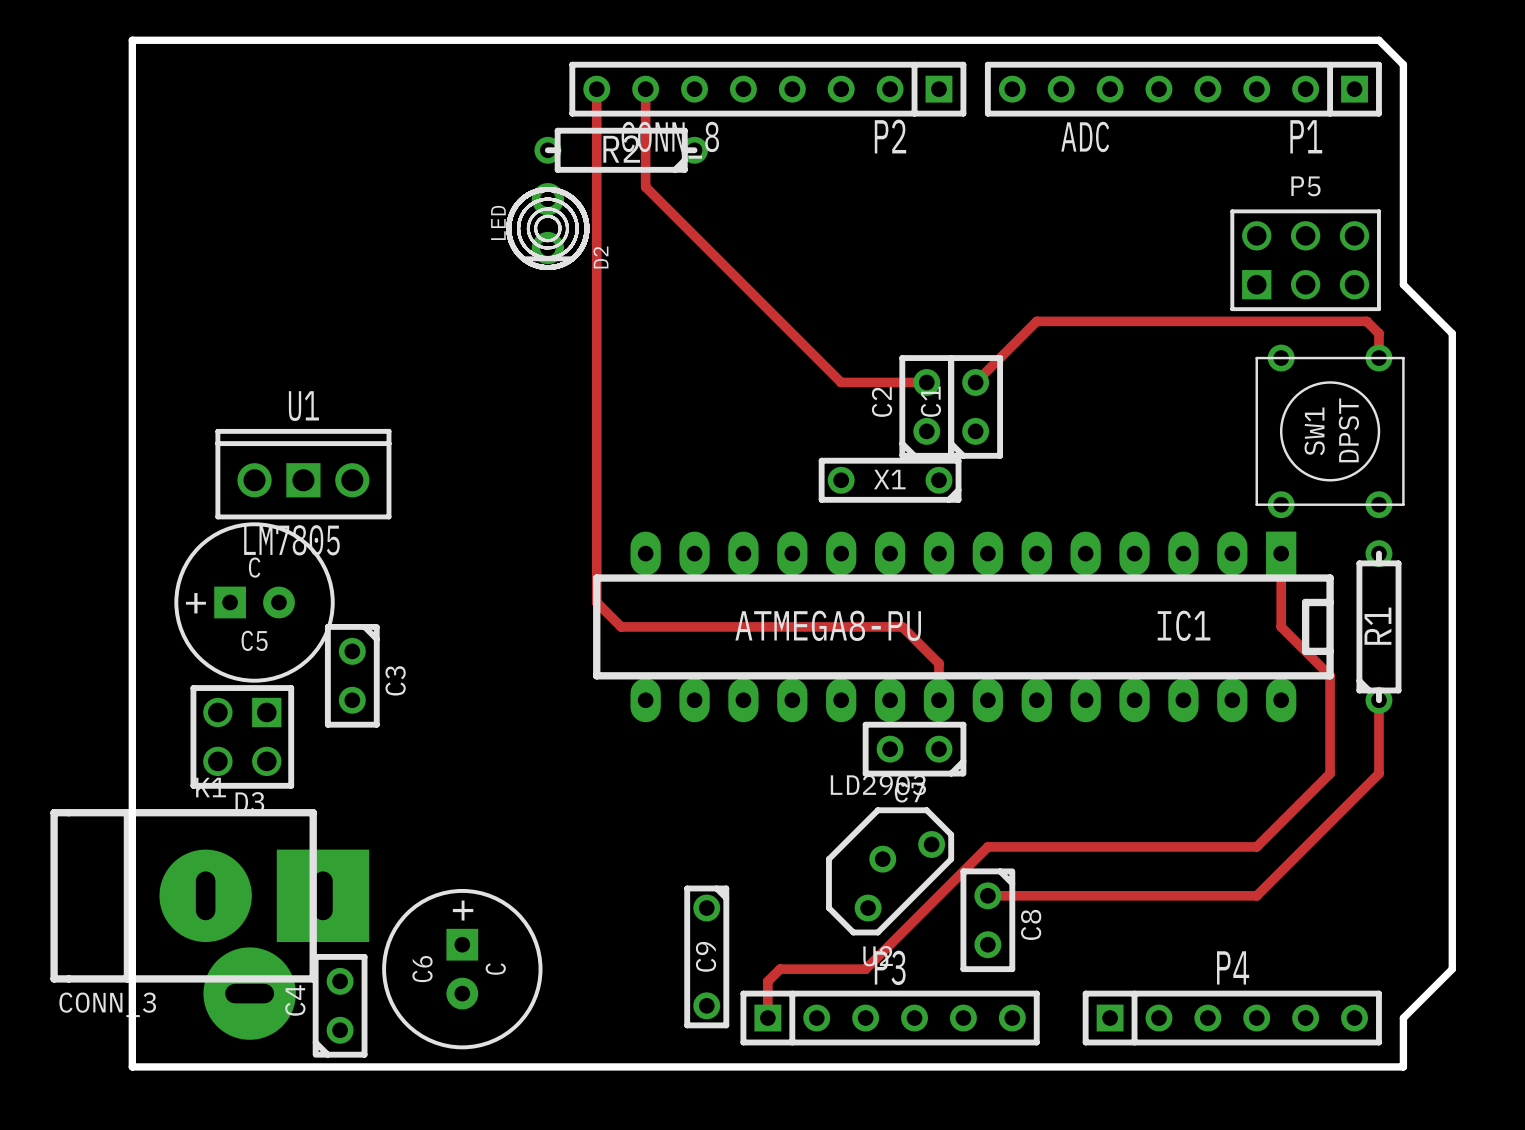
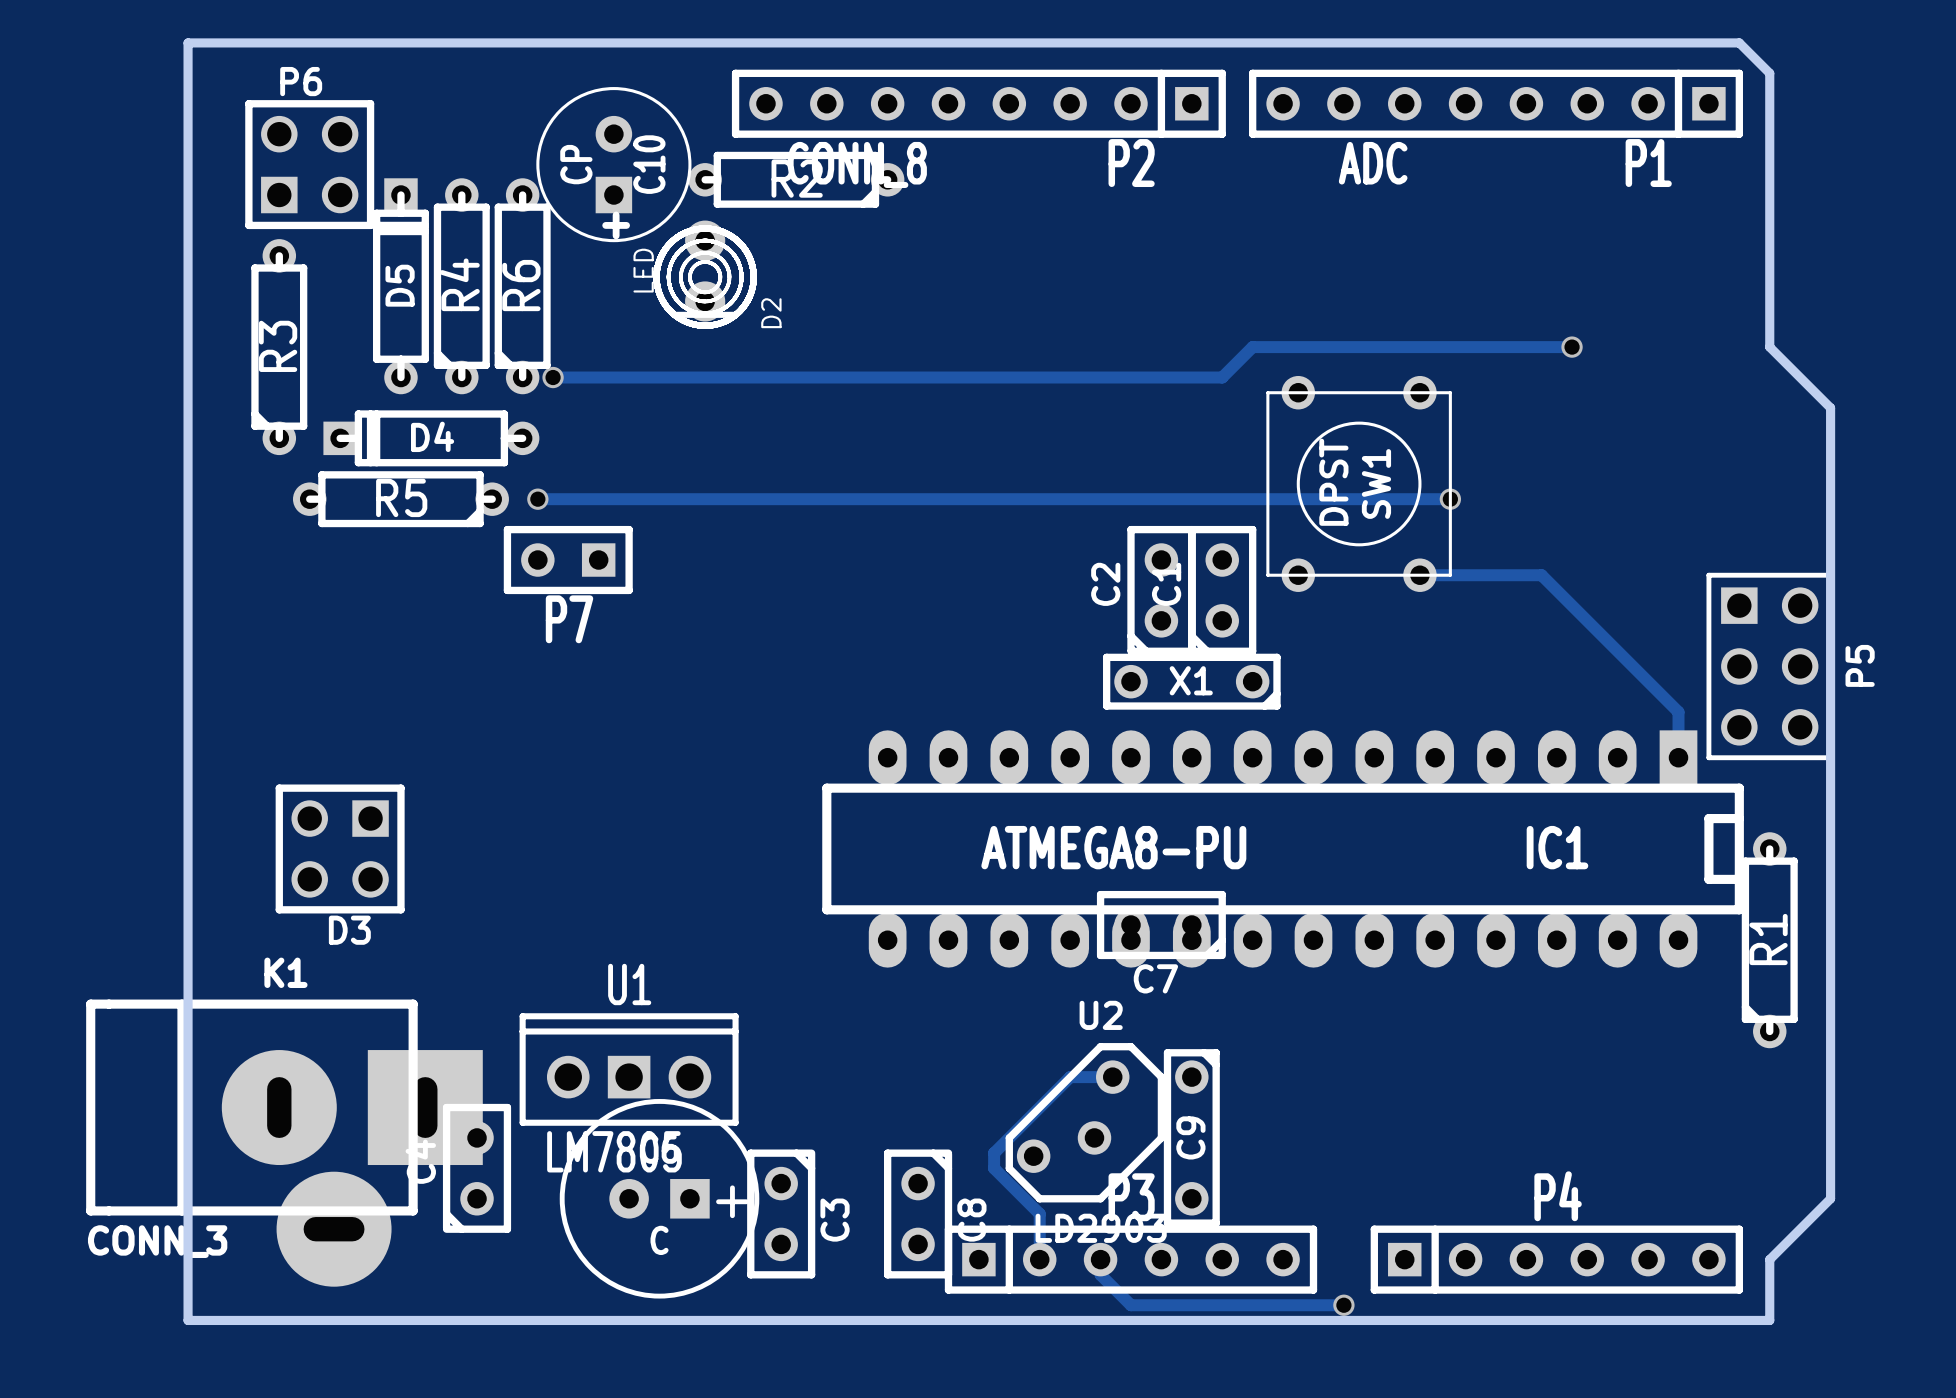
track: (596, 89) (596, 602) (621, 626) (902, 626) (938, 663) (938, 700) -> none
track: (645, 89) (645, 186) (841, 382) (926, 382) -> none
P6: none -> (309, 164)
C10: none -> CP (613, 164)
D5: none -> (400, 286)
R4: none -> (461, 286)
R6: none -> (522, 286)
P5 rotation: 0° (1305, 260) -> 90° clockwise (1769, 666)
P5 position: (1305, 260) -> (1769, 666)
R3: none -> (279, 347)
track: none -> (1572, 347) (1252, 347) (1222, 377) (553, 377)
via: none -> (1572, 347)
via: none -> (553, 377)
D4: none -> (431, 438)
track: (1378, 358) (1378, 333) (1366, 321) (1036, 321) (975, 382) -> none
R5: none -> (400, 499)
track: none -> (537, 499) (1450, 499)
via: none -> (537, 499)
C2 position: (926, 406) -> (1161, 590)
C1 position: (975, 406) -> (1222, 590)
via: none -> (1450, 499)
SW1 value position: DPST (1348, 430) -> DPST (1333, 482)
SW1 name position: SW1 (1314, 431) -> SW1 (1376, 483)
SW1 position: (1330, 431) -> (1359, 483)
P7: none -> (568, 560)
track: none -> (1419, 575) (1541, 575) (1678, 712) (1678, 757)
U1 position: (303, 474) -> (629, 1069)
X1 position: (890, 480) -> (1191, 681)
track: (1281, 553) (1281, 626) (1330, 675) (1330, 773) (1256, 846) (987, 846) (865, 969) (780, 969) (767, 981) (767, 1018) -> none
C5: C (254, 602) -> none
IC1 position: (963, 626) -> (1283, 848)
R1 position: (1378, 626) -> (1769, 940)
C3 position: (352, 675) -> (781, 1213)
track: (1378, 700) (1378, 773) (1256, 895) (987, 895) -> none
D3 position: (242, 736) -> (340, 848)
track: none -> (1112, 1077) (1070, 1077) (994, 1153) (994, 1168) (1039, 1213) (1039, 1259)
U2 rotation: 0° (890, 871) -> 180° (1085, 1122)
C8 position: (987, 920) -> (918, 1213)
C9 position: (706, 956) -> (1191, 1137)
C6 rotation: 0° (462, 969) -> 90° clockwise (659, 1198)
C4 position: (340, 1005) -> (477, 1168)
track: none -> (1100, 1259) (1100, 1274) (1130, 1305) (1343, 1305)
via: none -> (1343, 1305)

